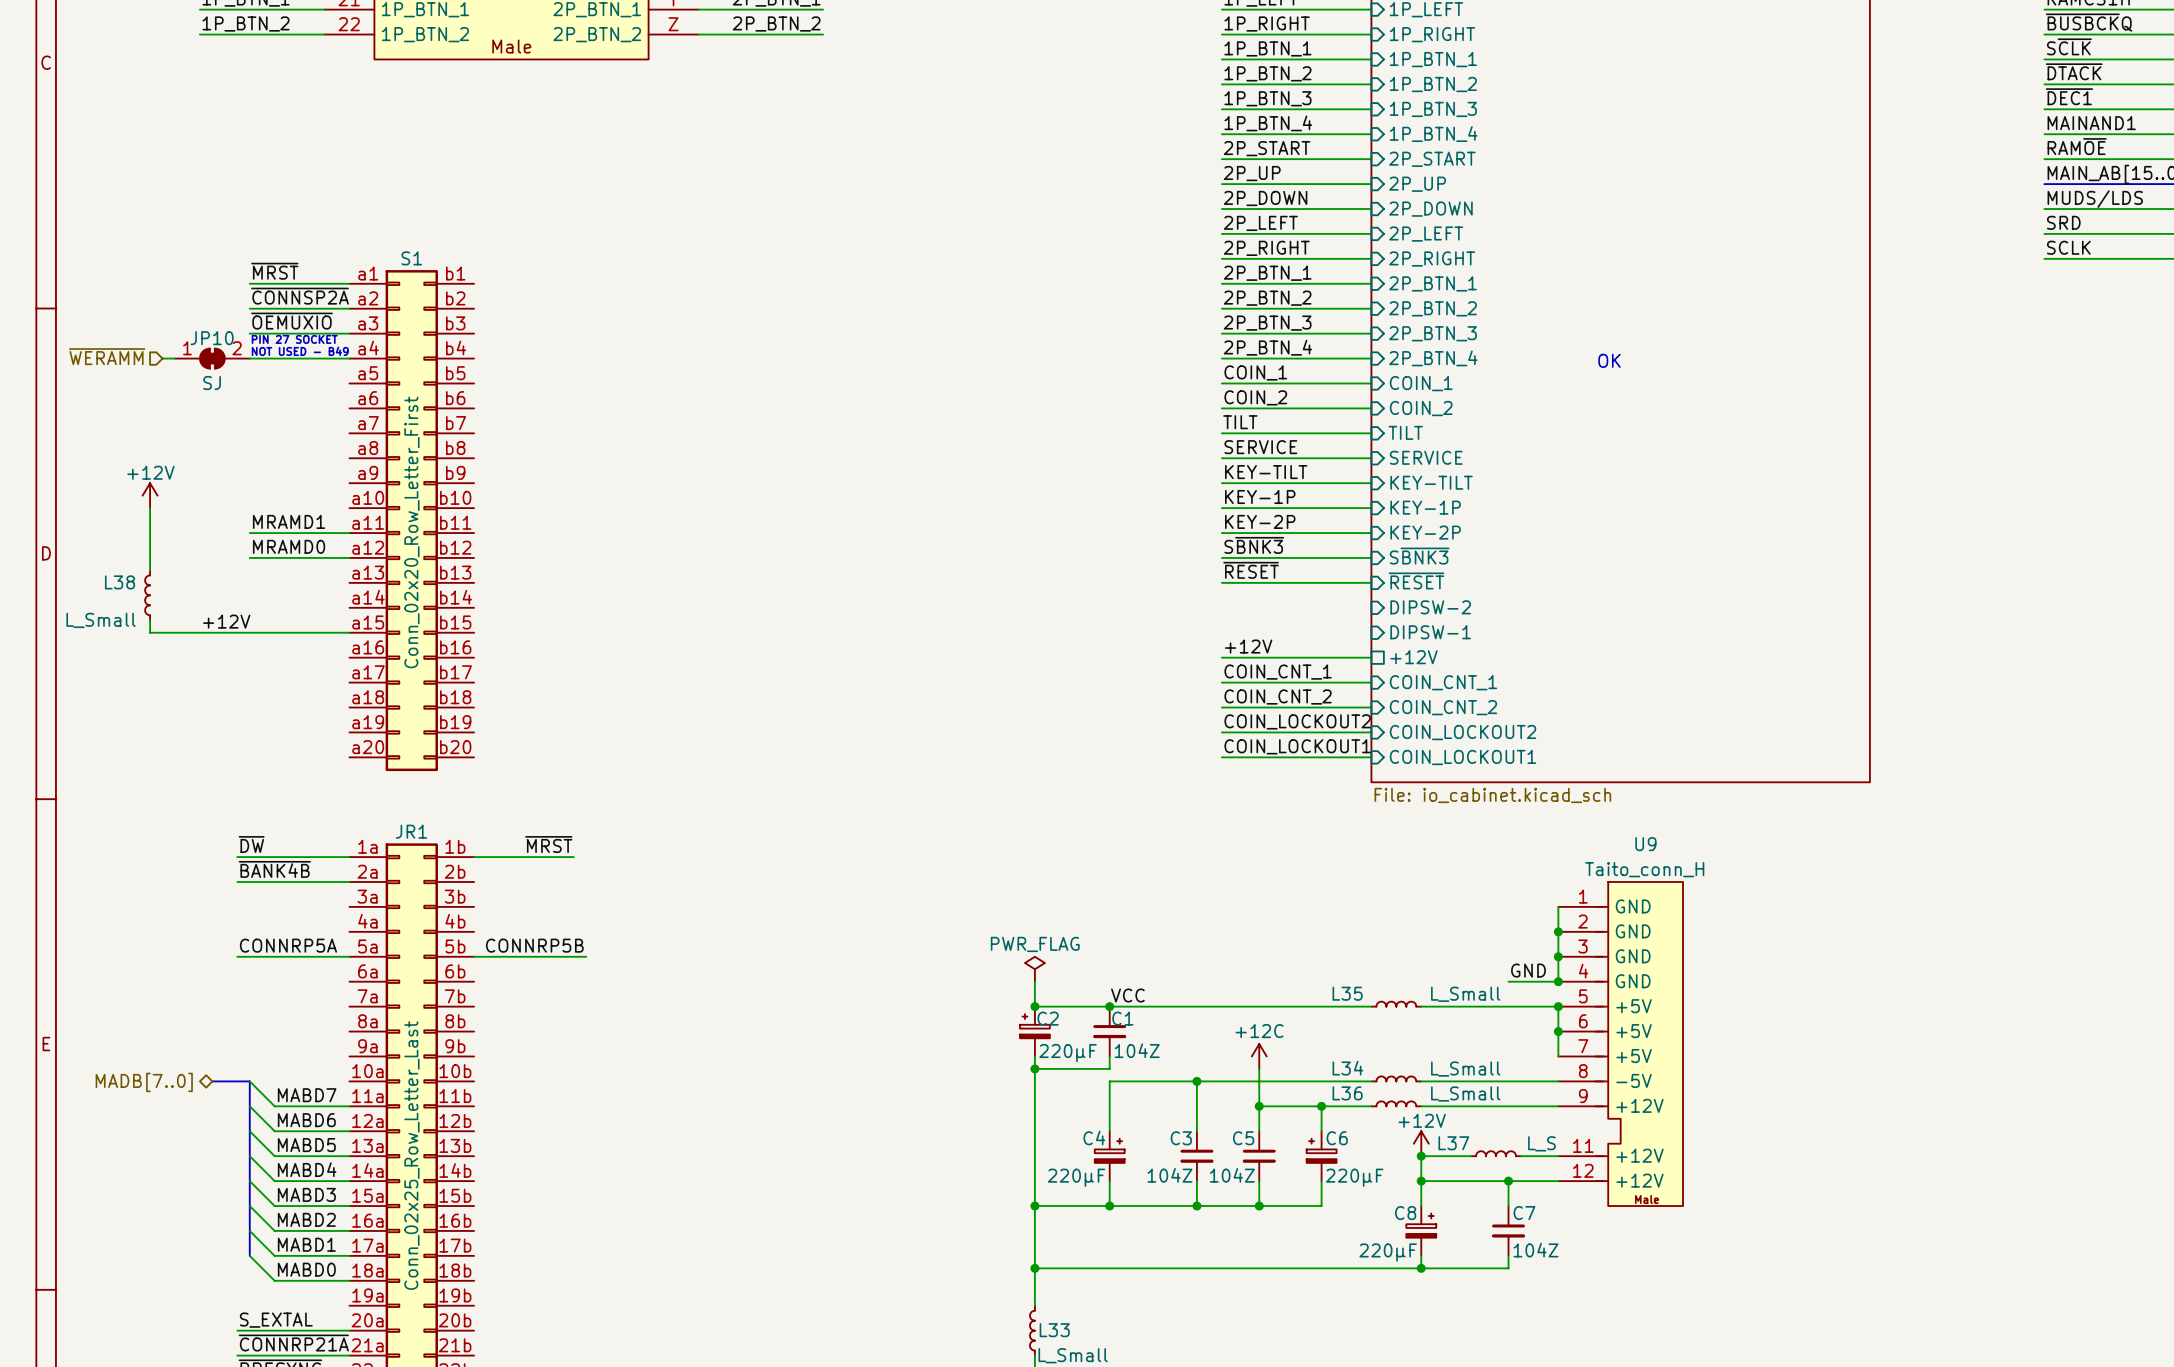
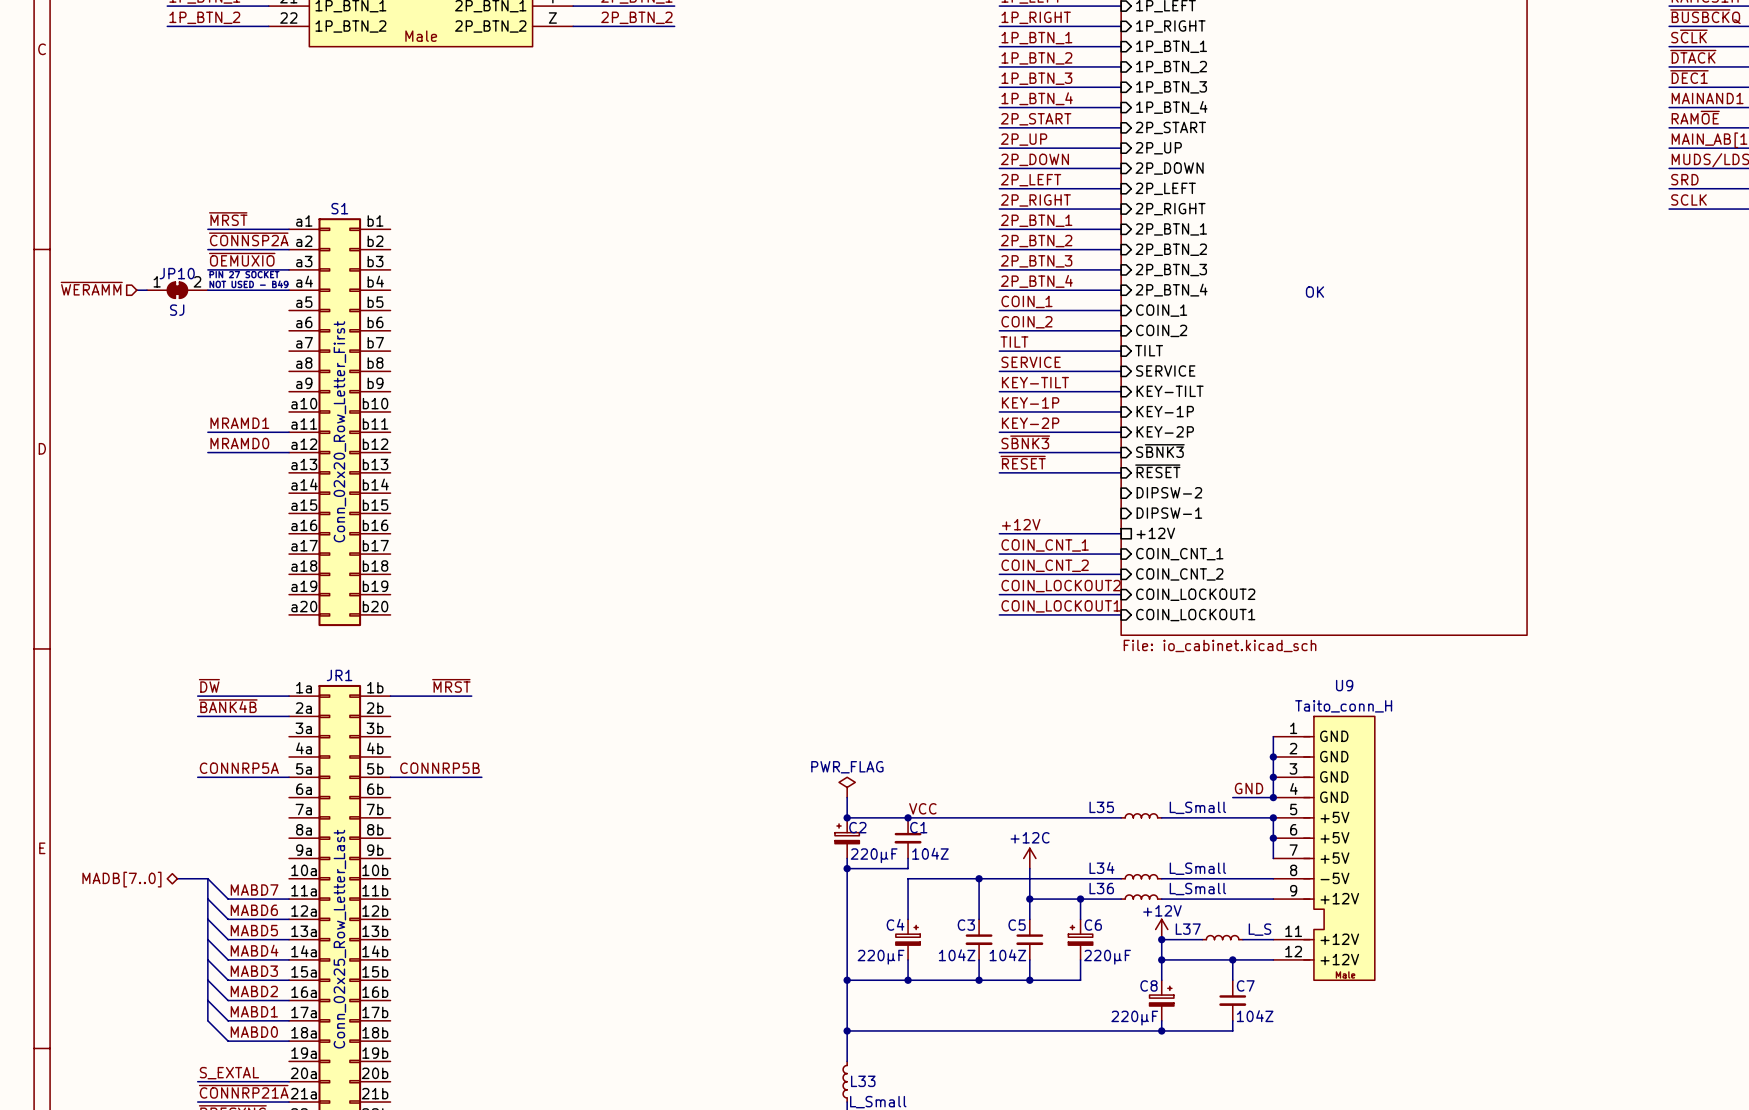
power symbol: +12V (150, 495) -> none
wire: (150, 508) (150, 570) -> none
L38: L_Small (147, 595) -> none
wire: (150, 620) (150, 632) (349, 632) -> none
label: +12V (226, 621) -> none

